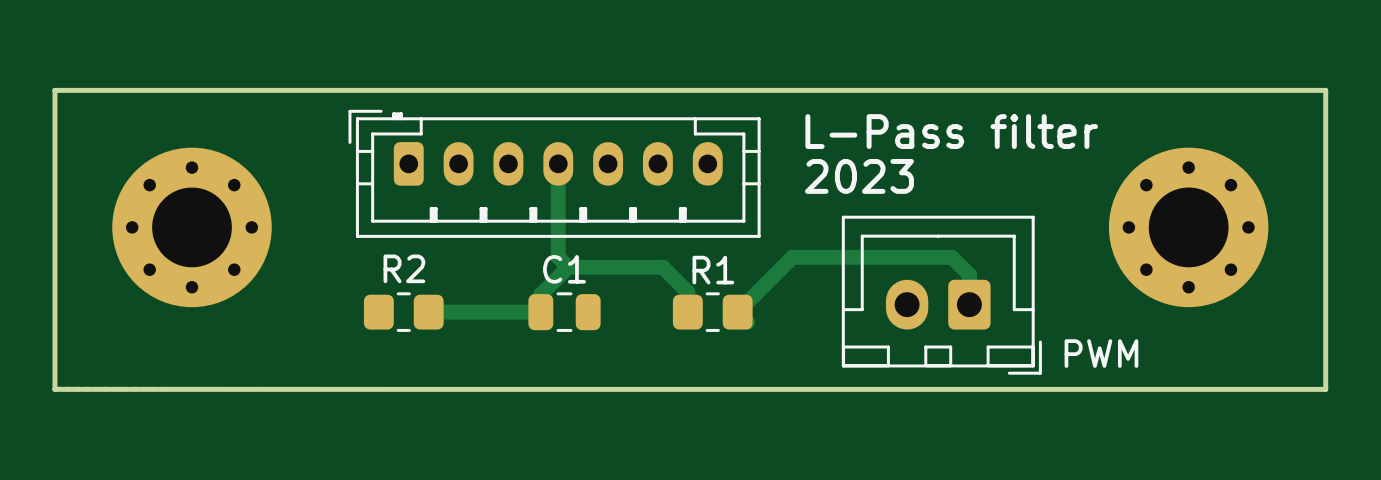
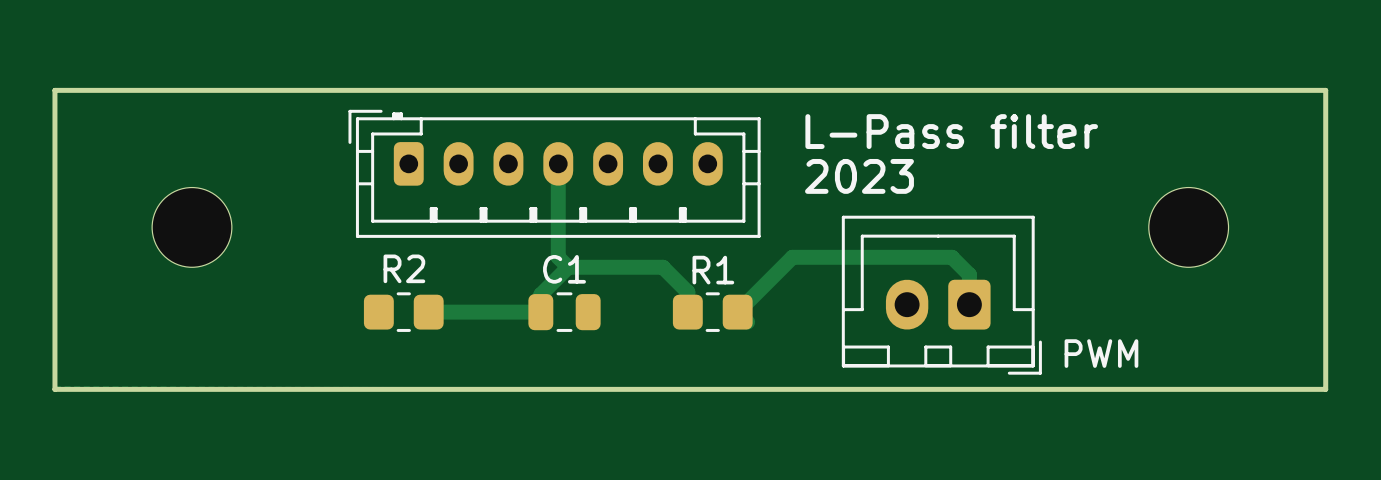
part footprint: [112, 147, 272, 308] -> [152, 187, 232, 268]
part footprint: [1108, 147, 1269, 308] -> [1148, 187, 1229, 268]

